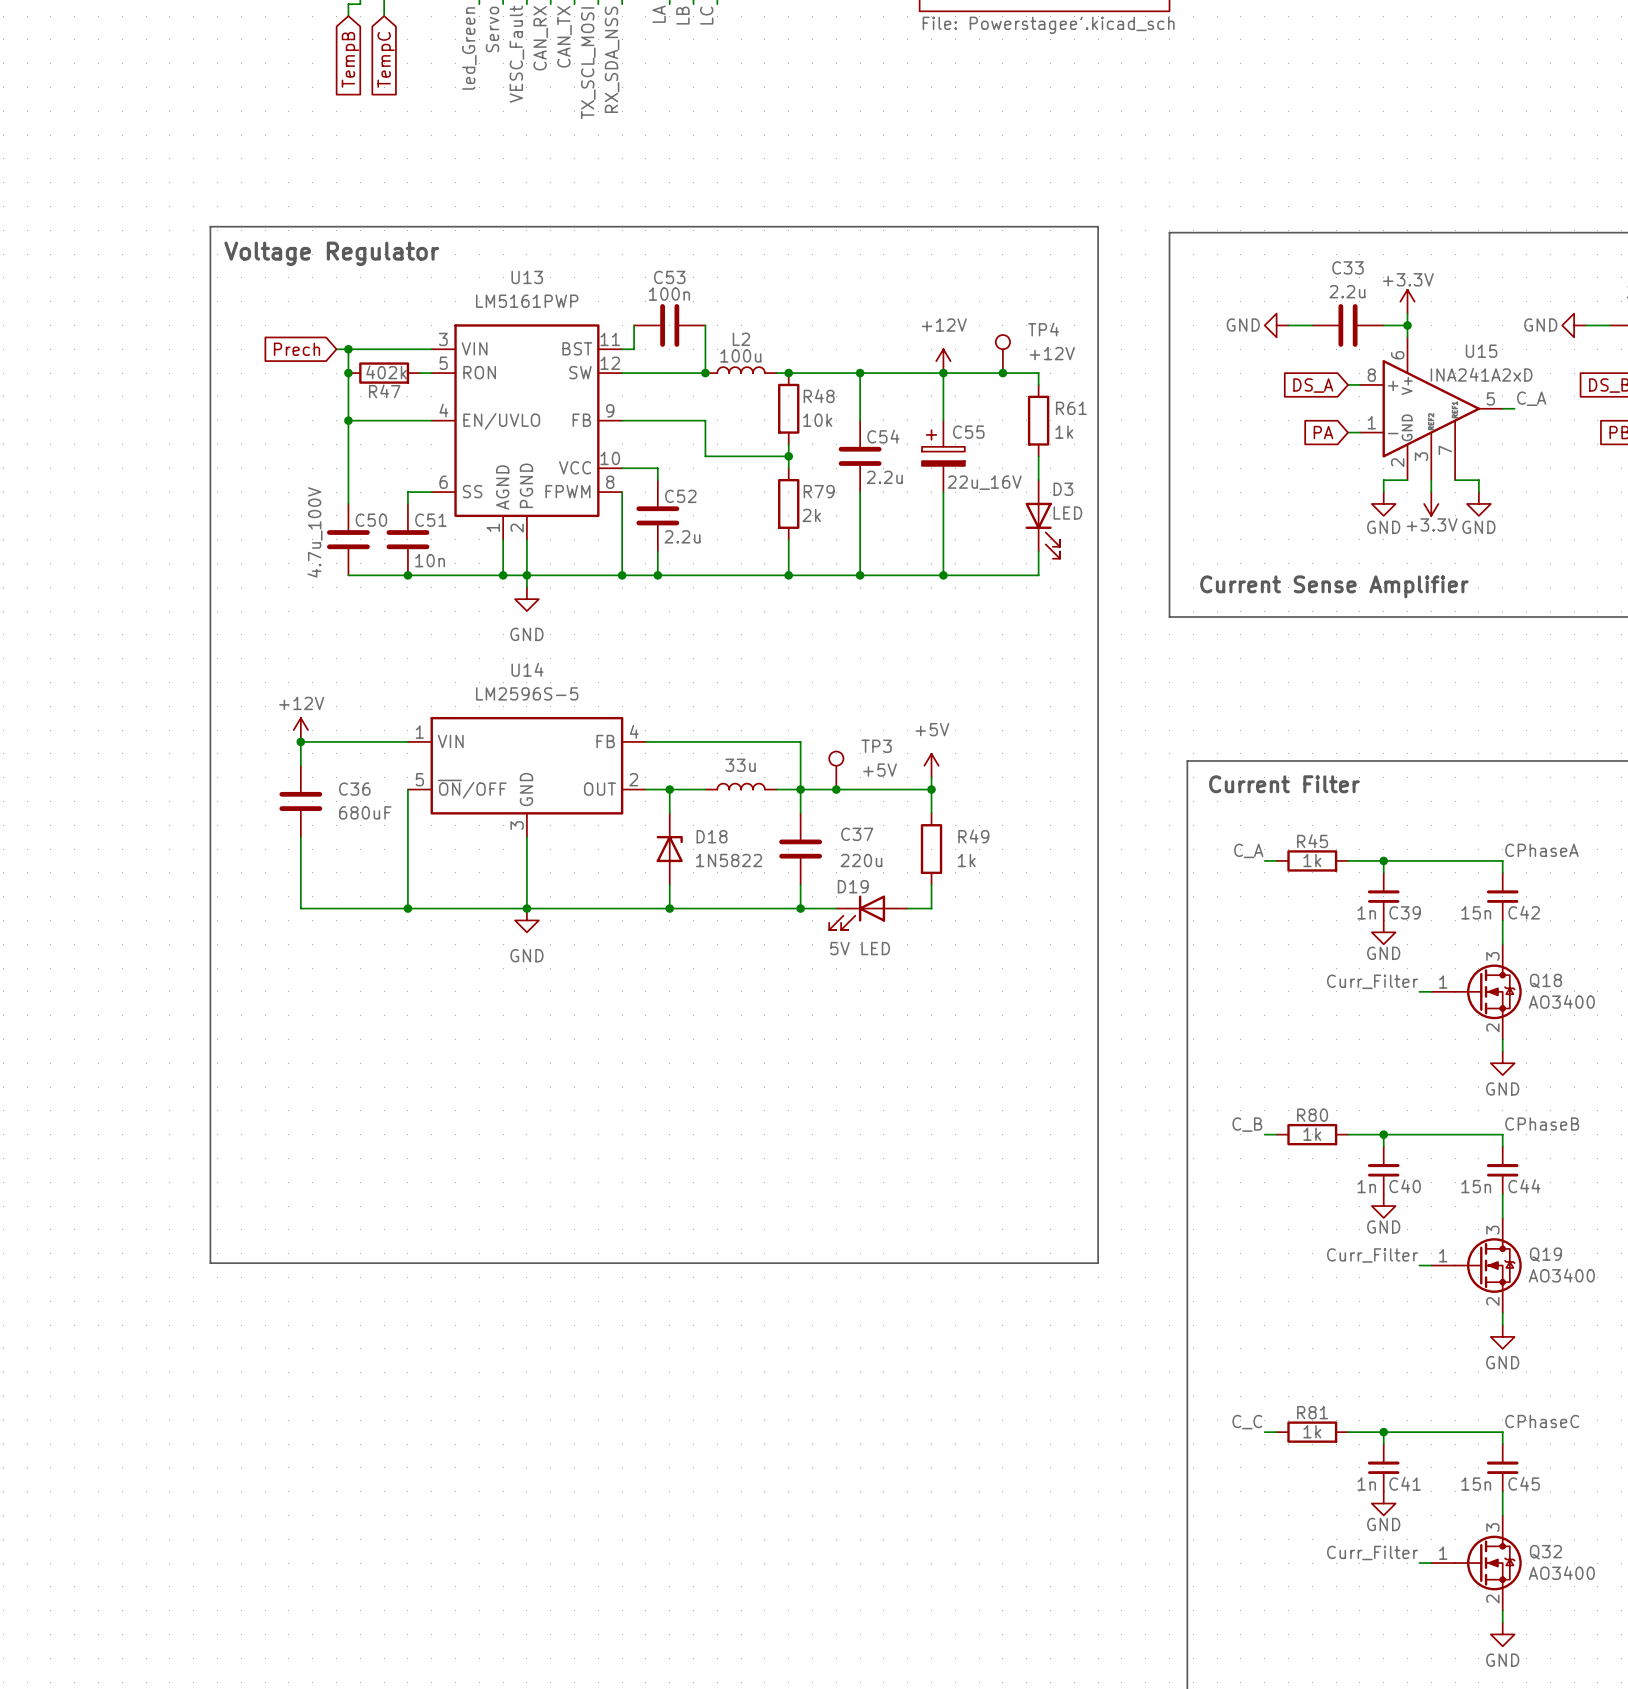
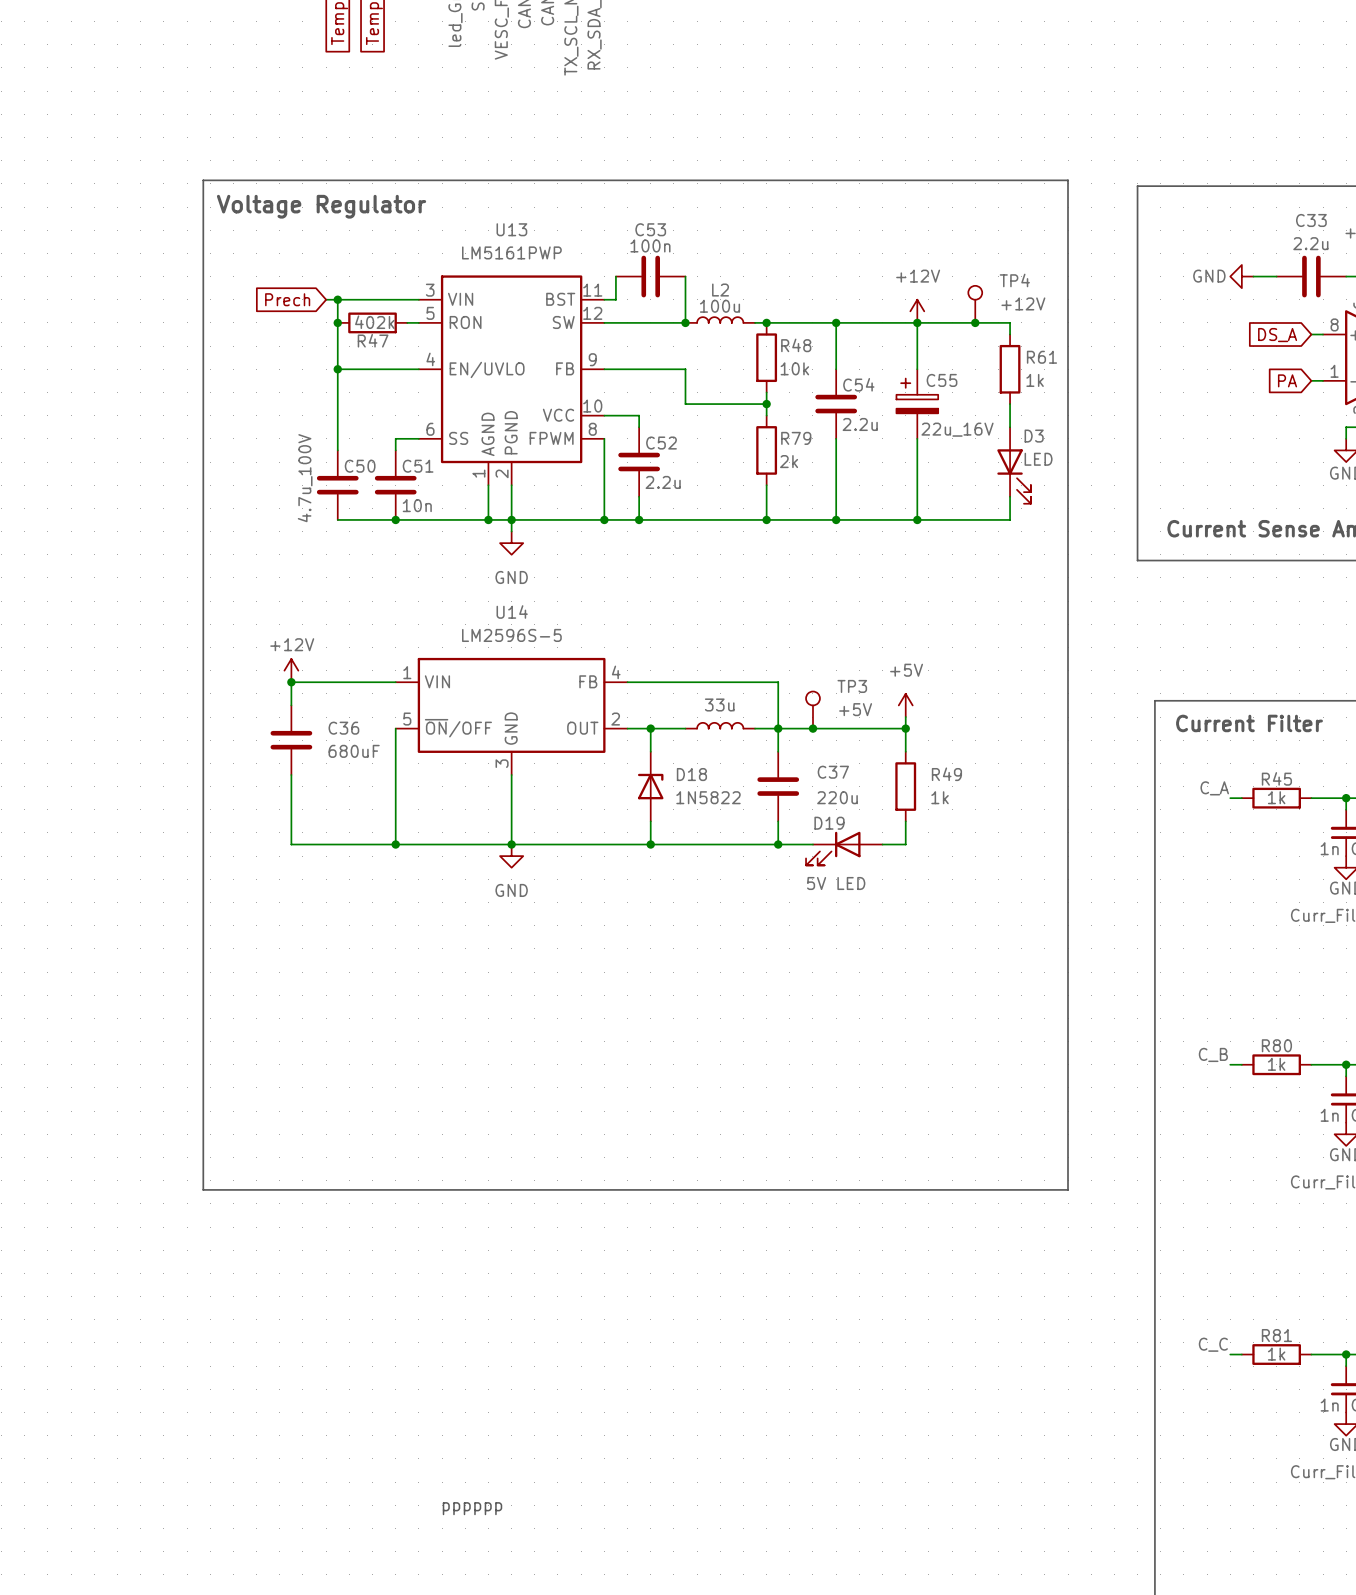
text: none -> pppppp (472, 1508)

